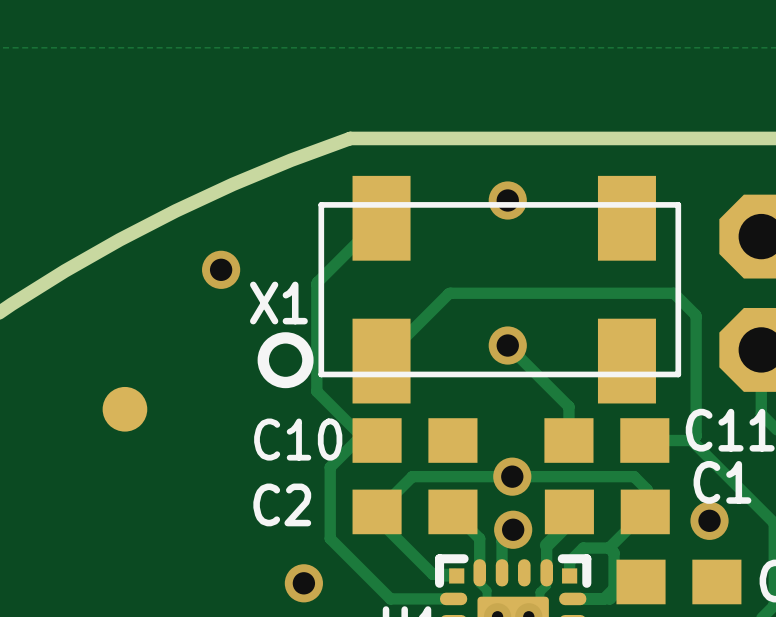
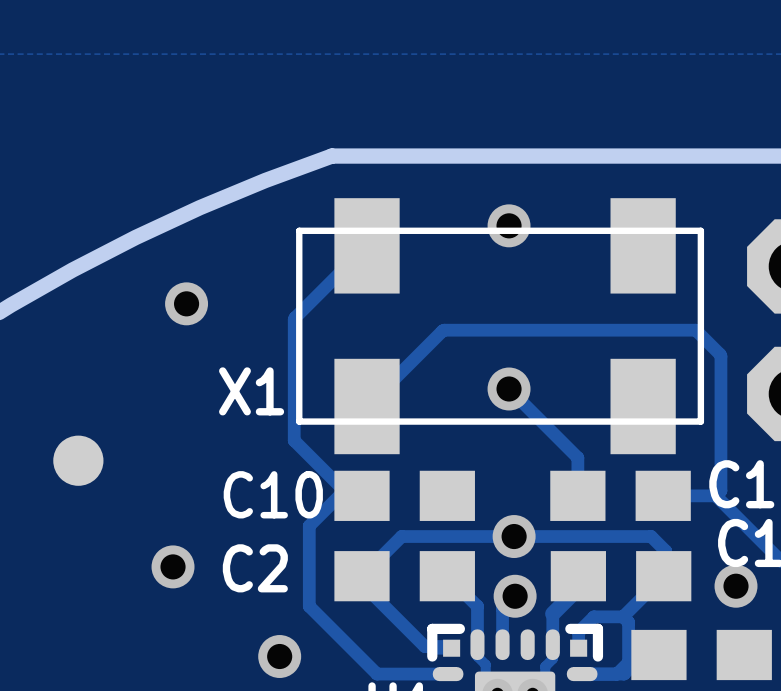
text position: X1 (278, 303) -> X1 (251, 391)
drawing: [257, 332, 314, 389] -> none
via: none -> (173, 566)

